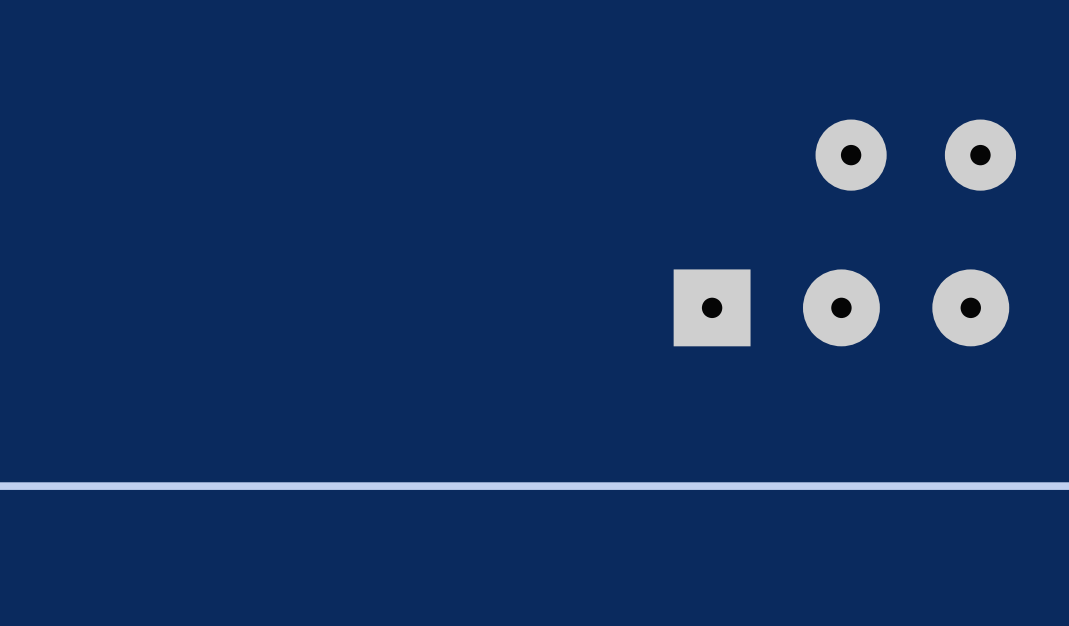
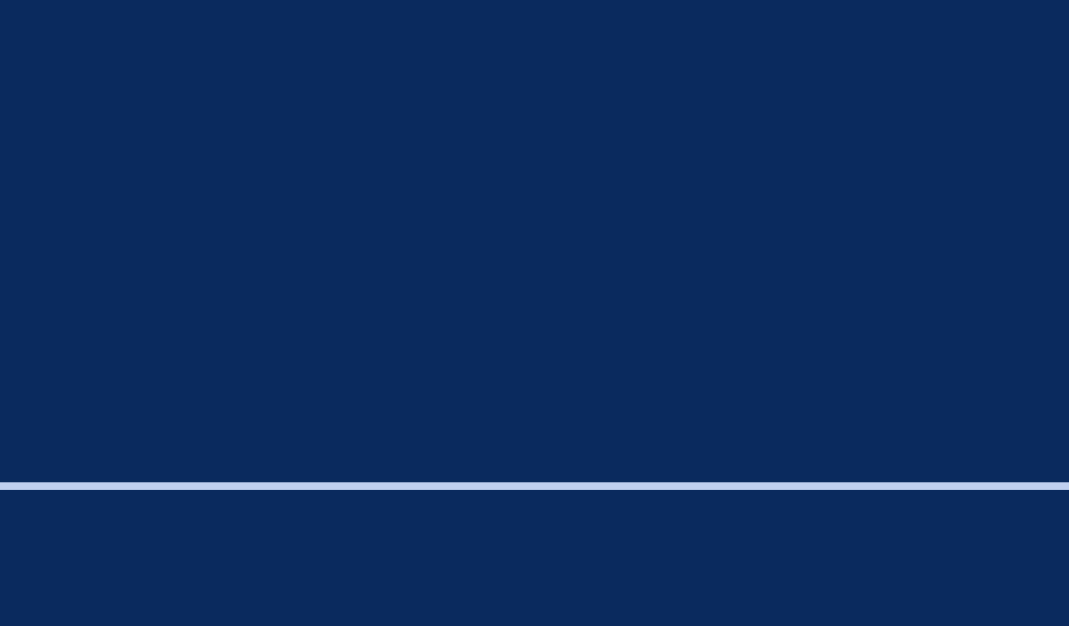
part: (915, 155) -> none
part: (841, 307) -> none

